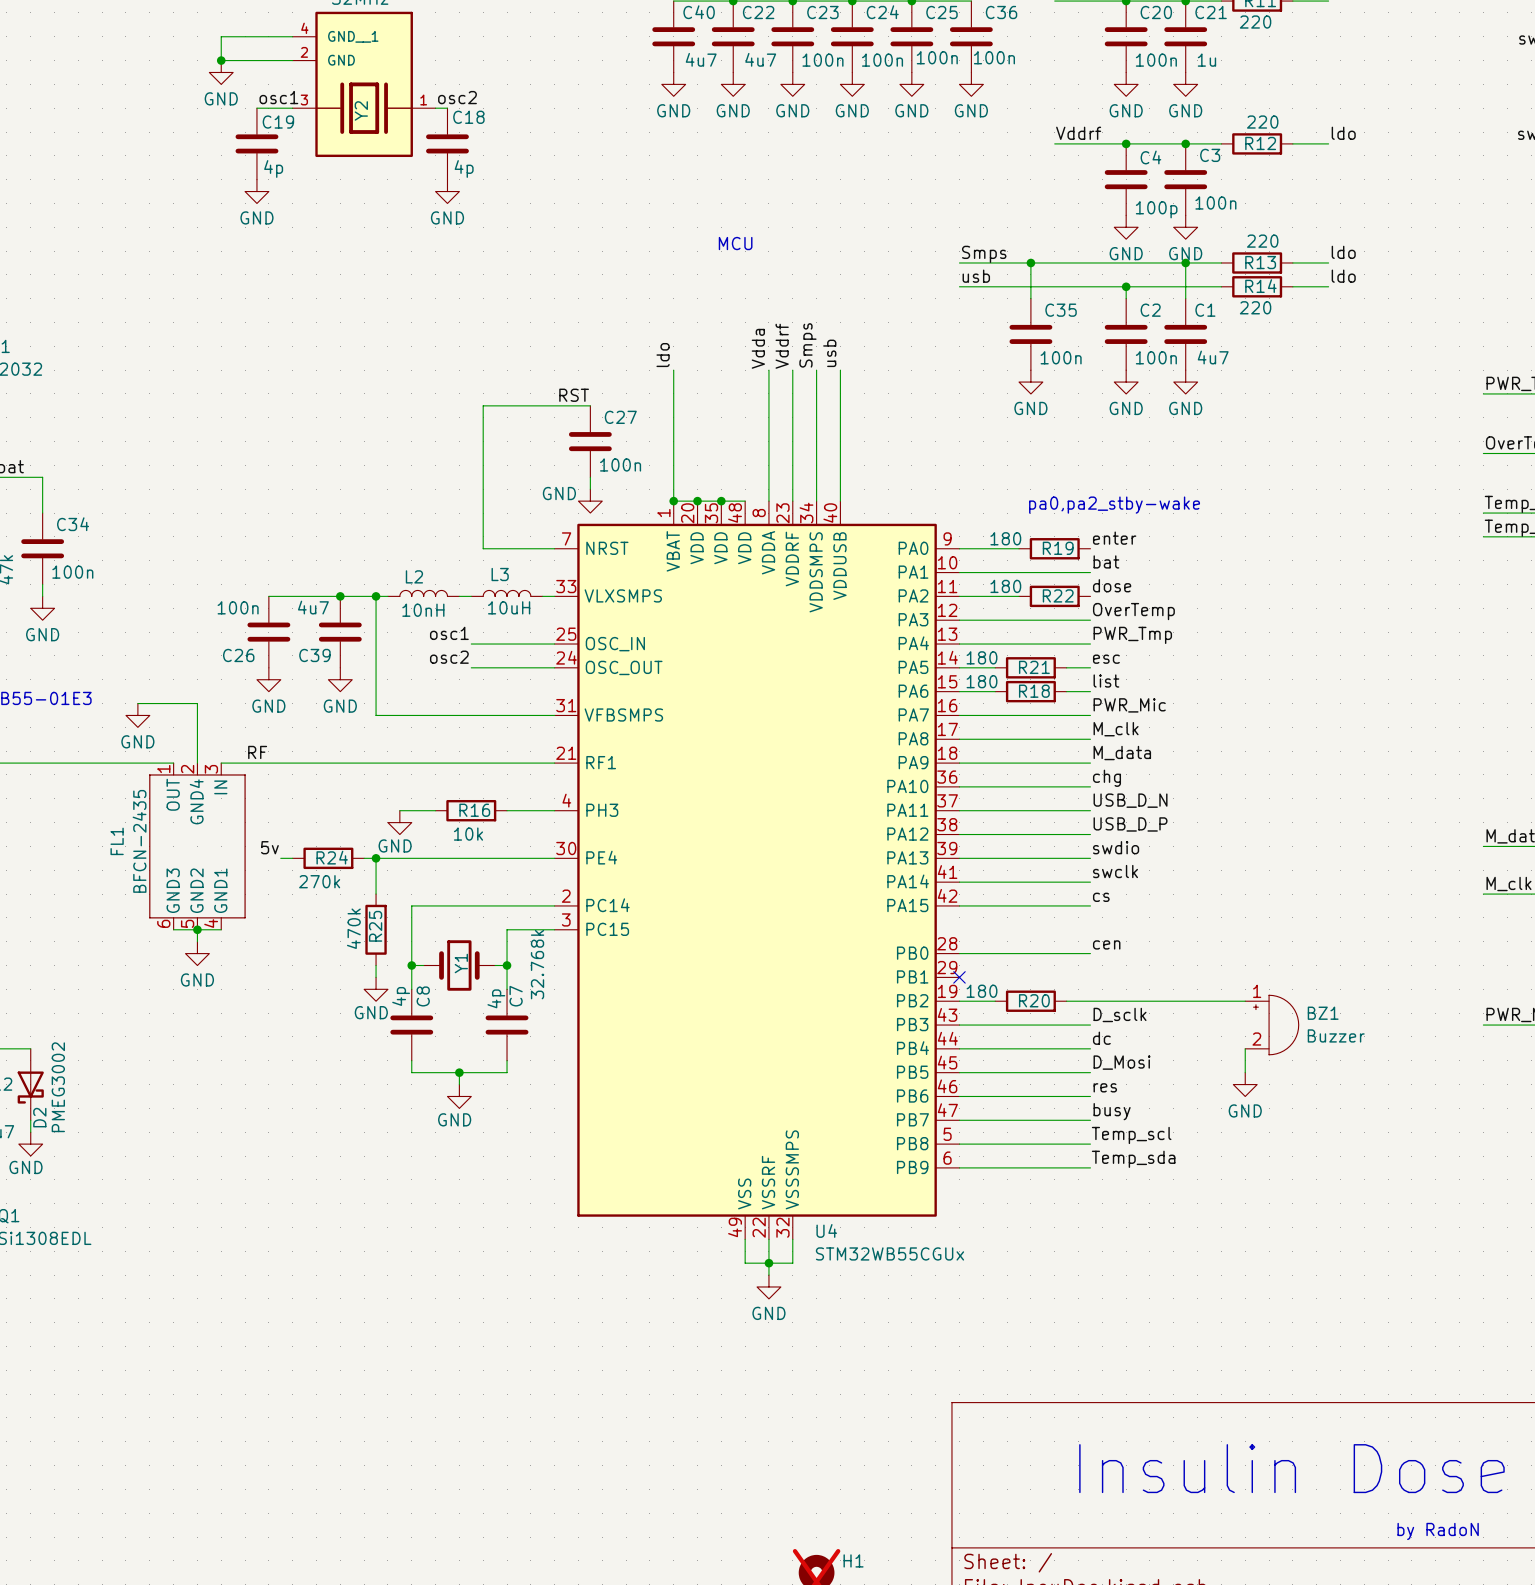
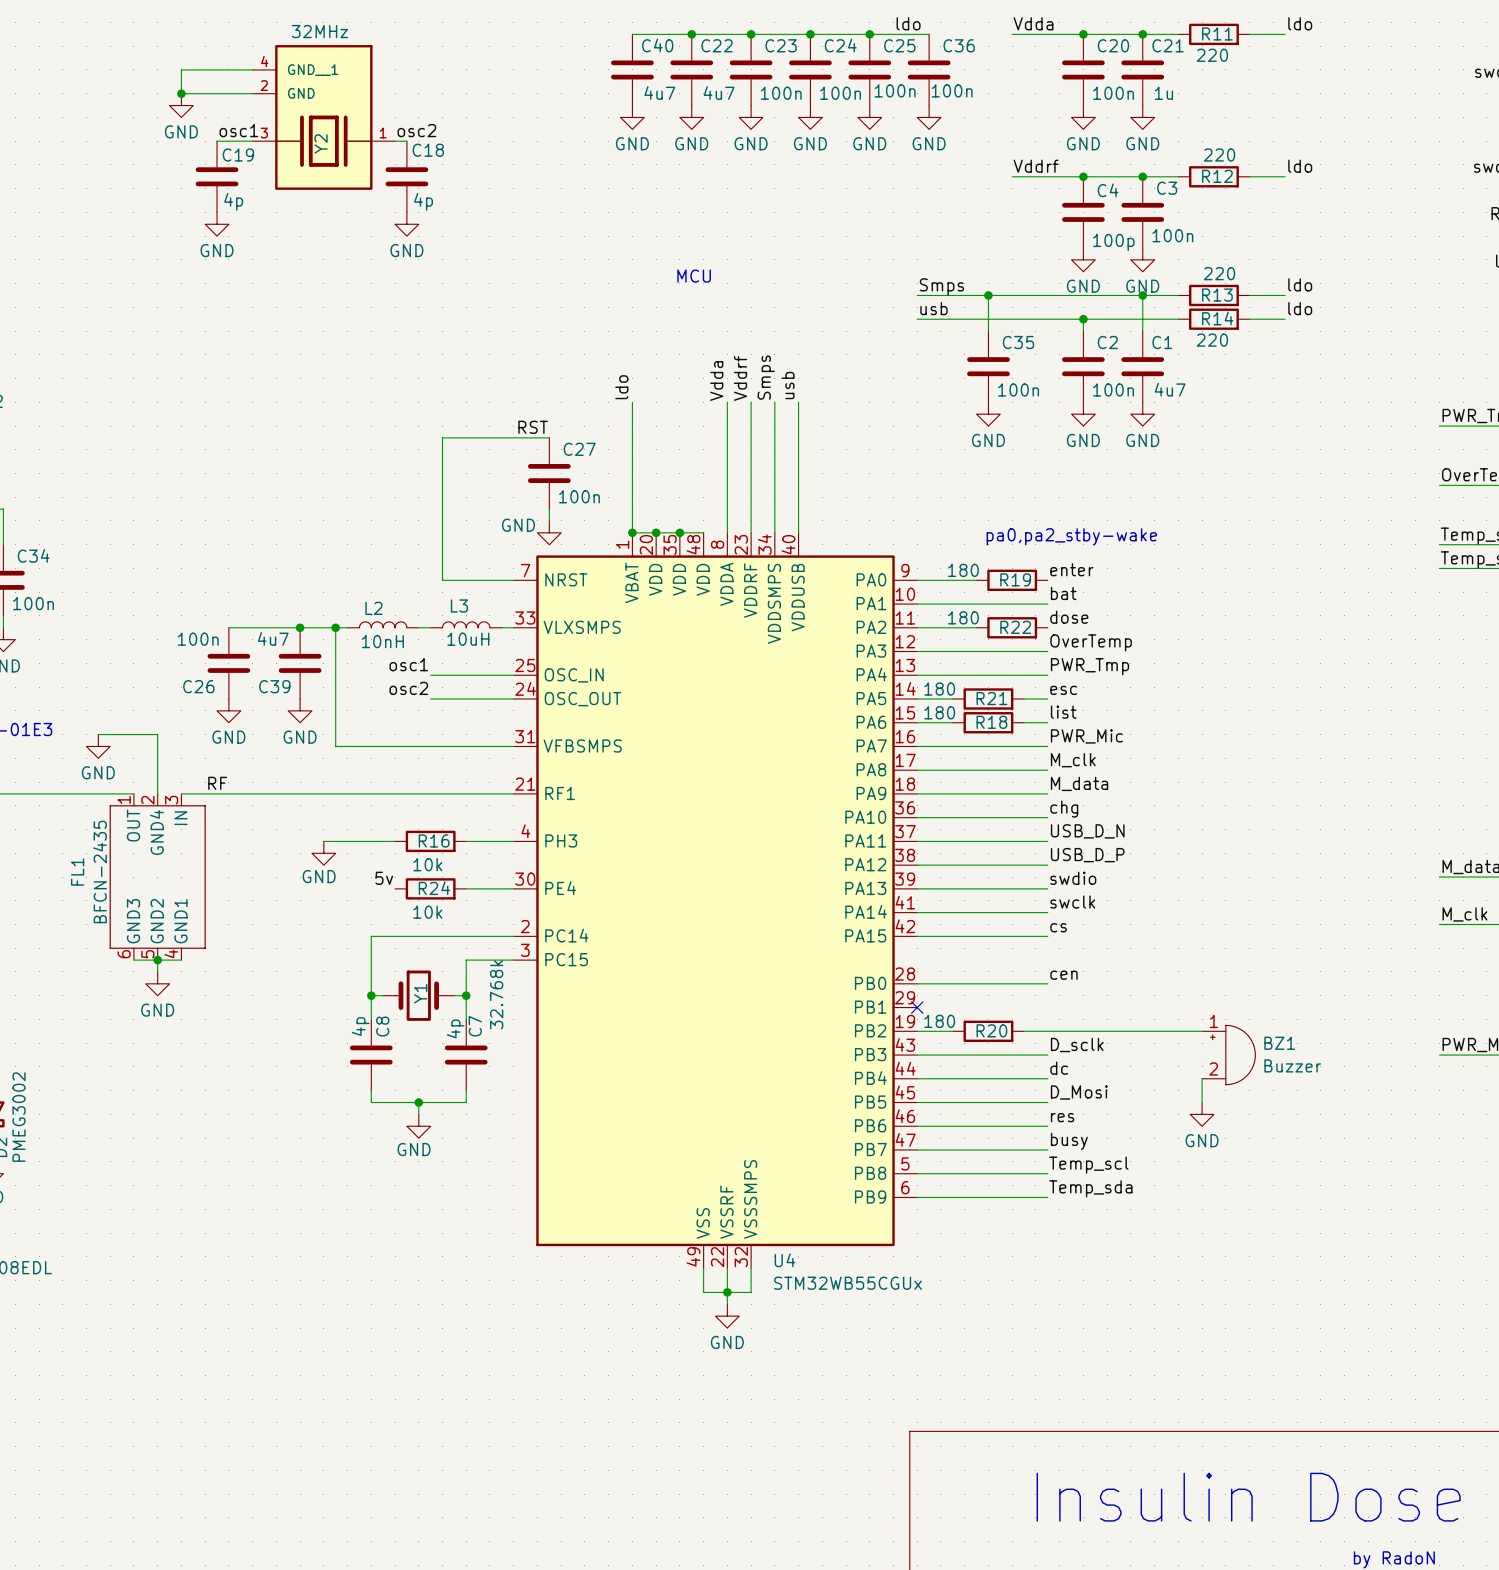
wire: none -> (323, 841) (359, 841)
power symbol position: GND (399, 822) -> GND (323, 853)
label position: 5v (269, 847) -> 5v (384, 878)
wire: (280, 858) (292, 858) -> none
R24 position: (328, 858) -> (430, 888)
wire: (364, 858) (507, 858) -> none
wire: (376, 858) (376, 894) -> none
junction: (376, 858) -> none
R24 value: 270k (319, 881) -> 10k (427, 912)
R25: 470k (376, 929) -> none
wire: (376, 965) (376, 977) -> none
power symbol: GND (376, 989) -> none

